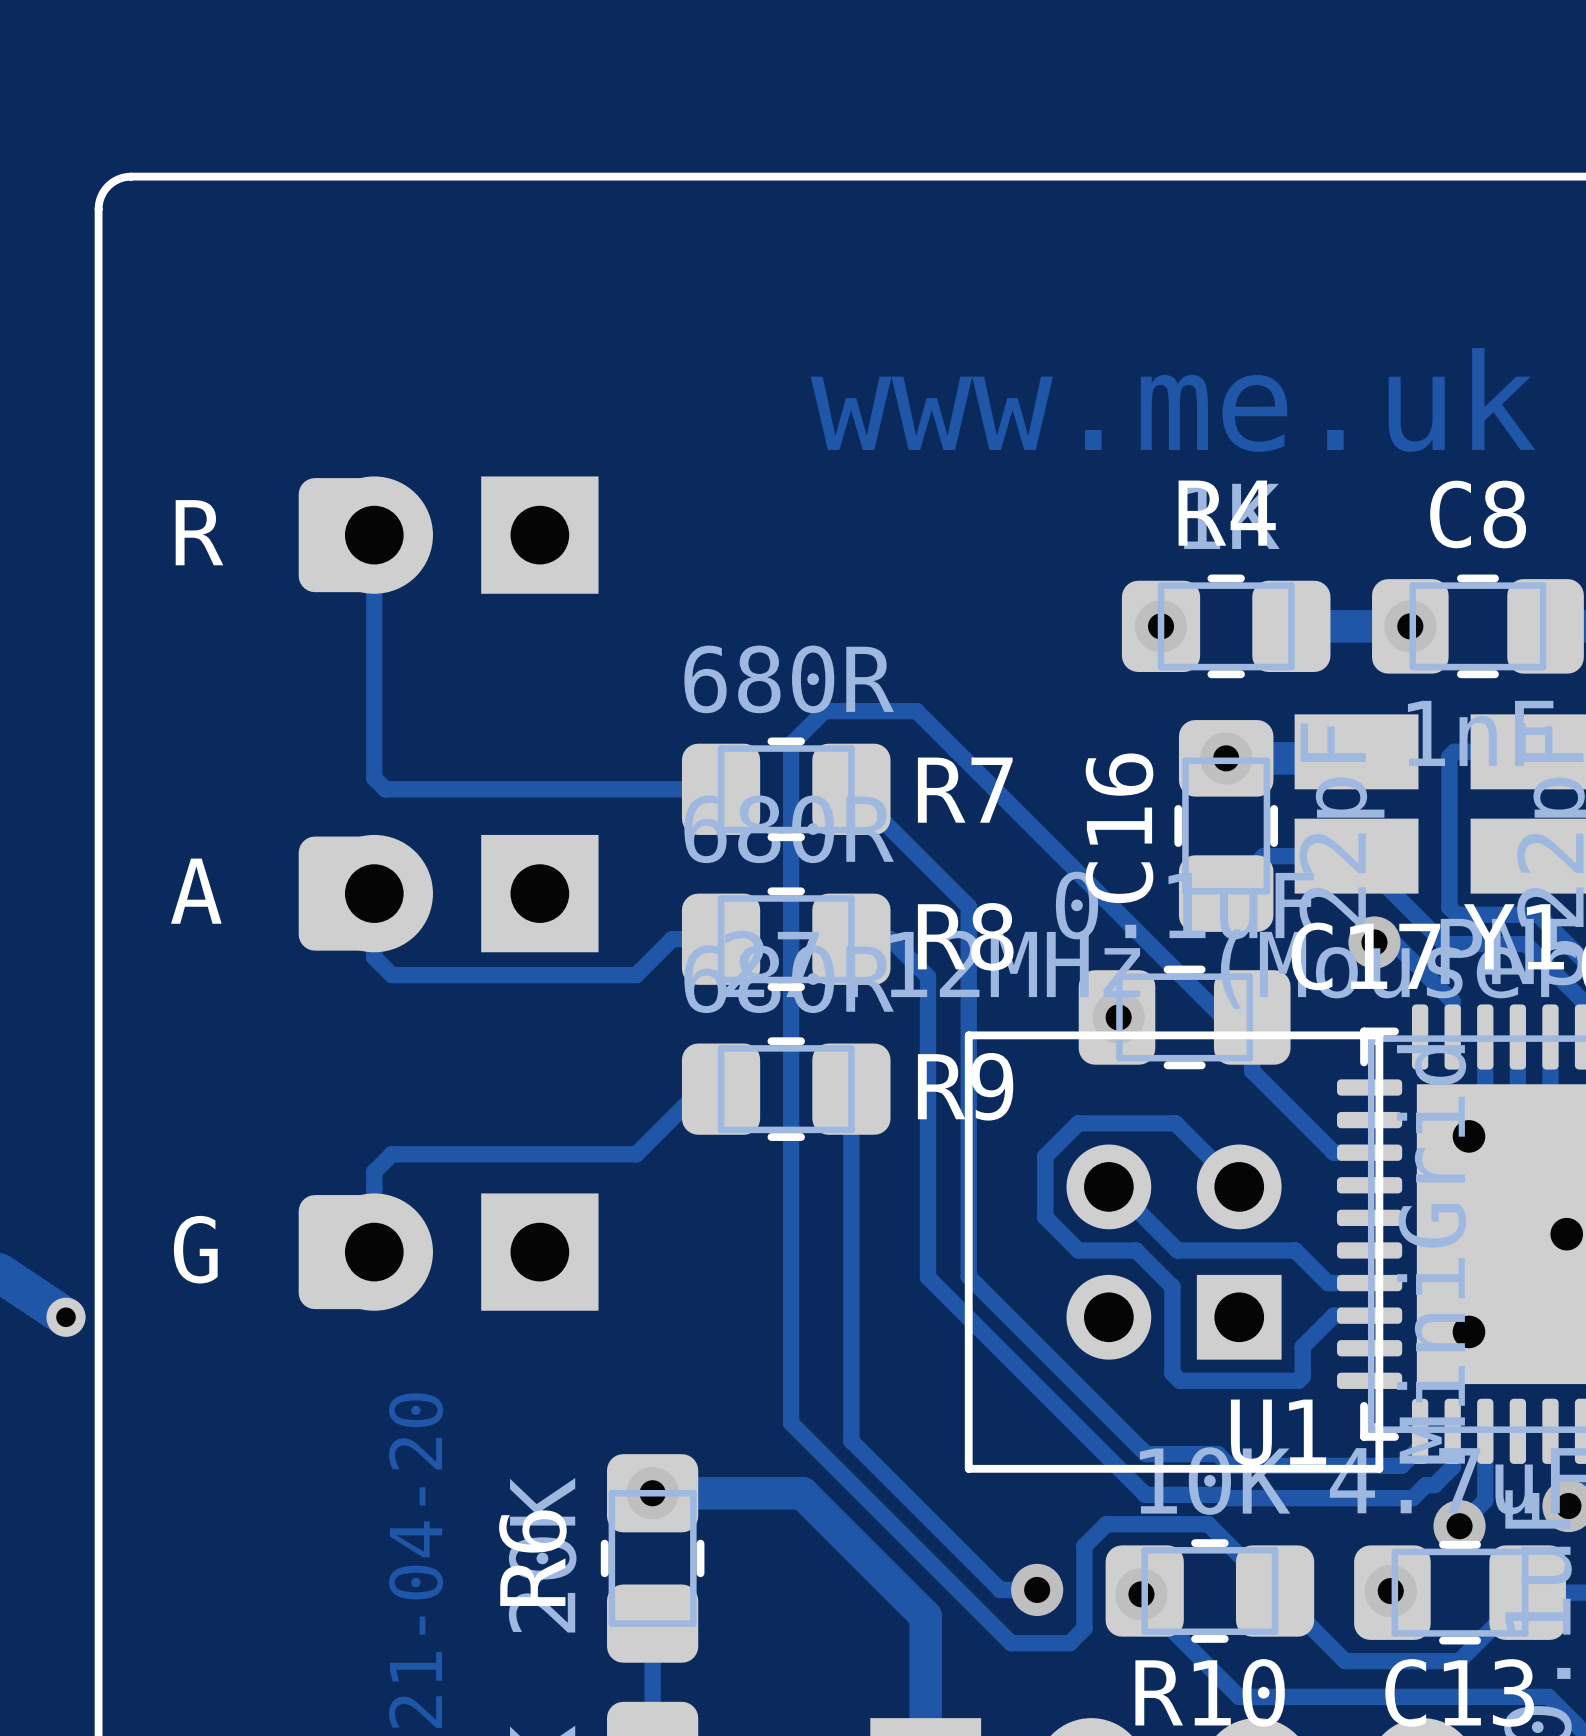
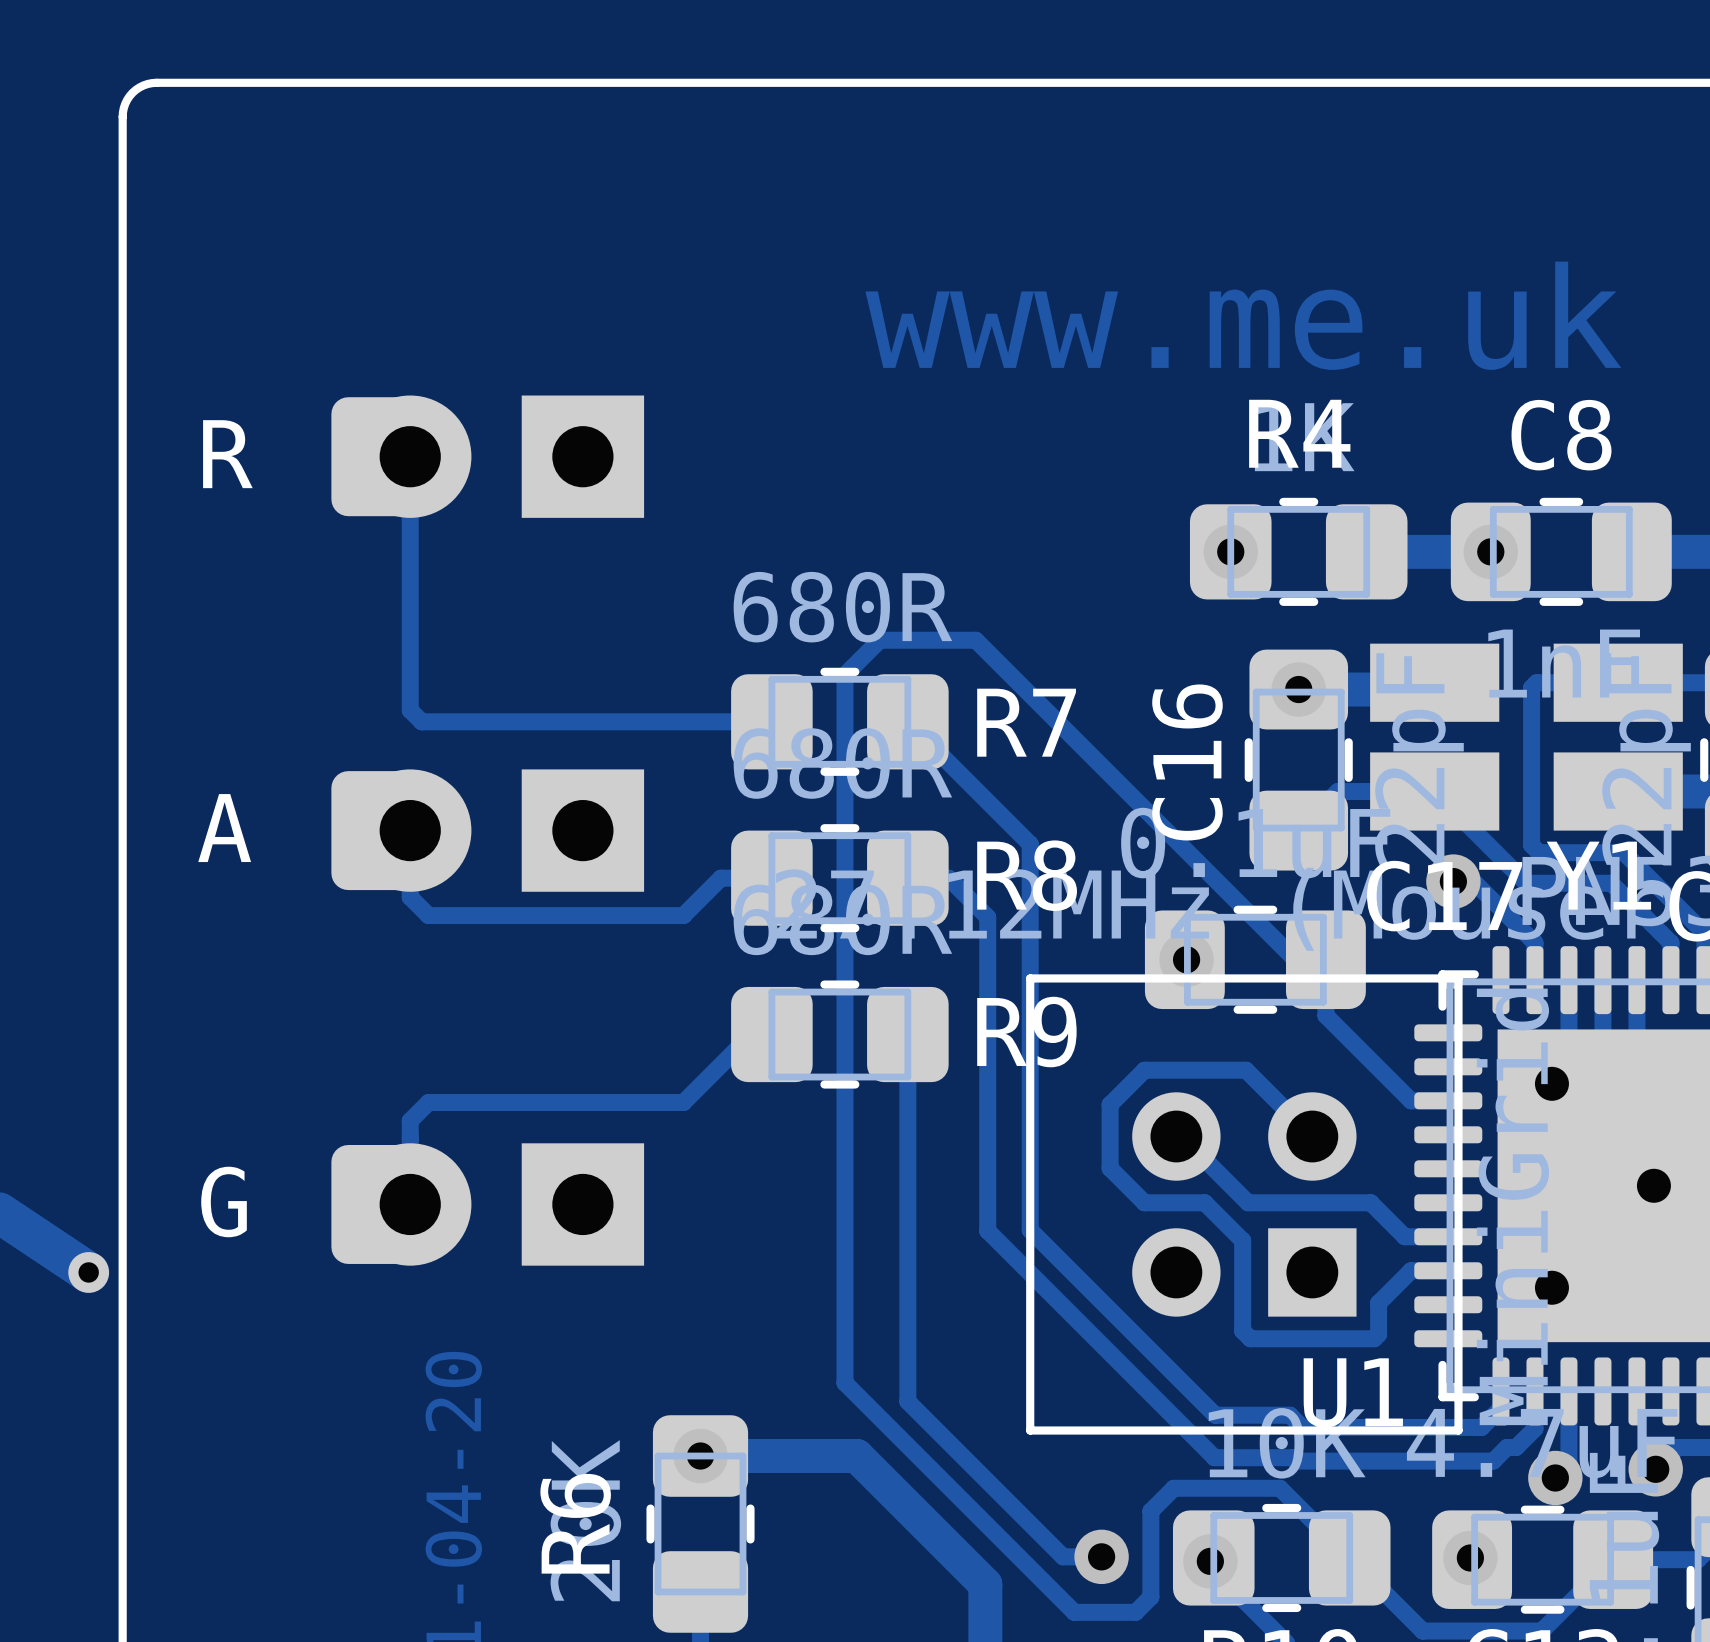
via position: (1459, 1526) -> (1555, 1478)

